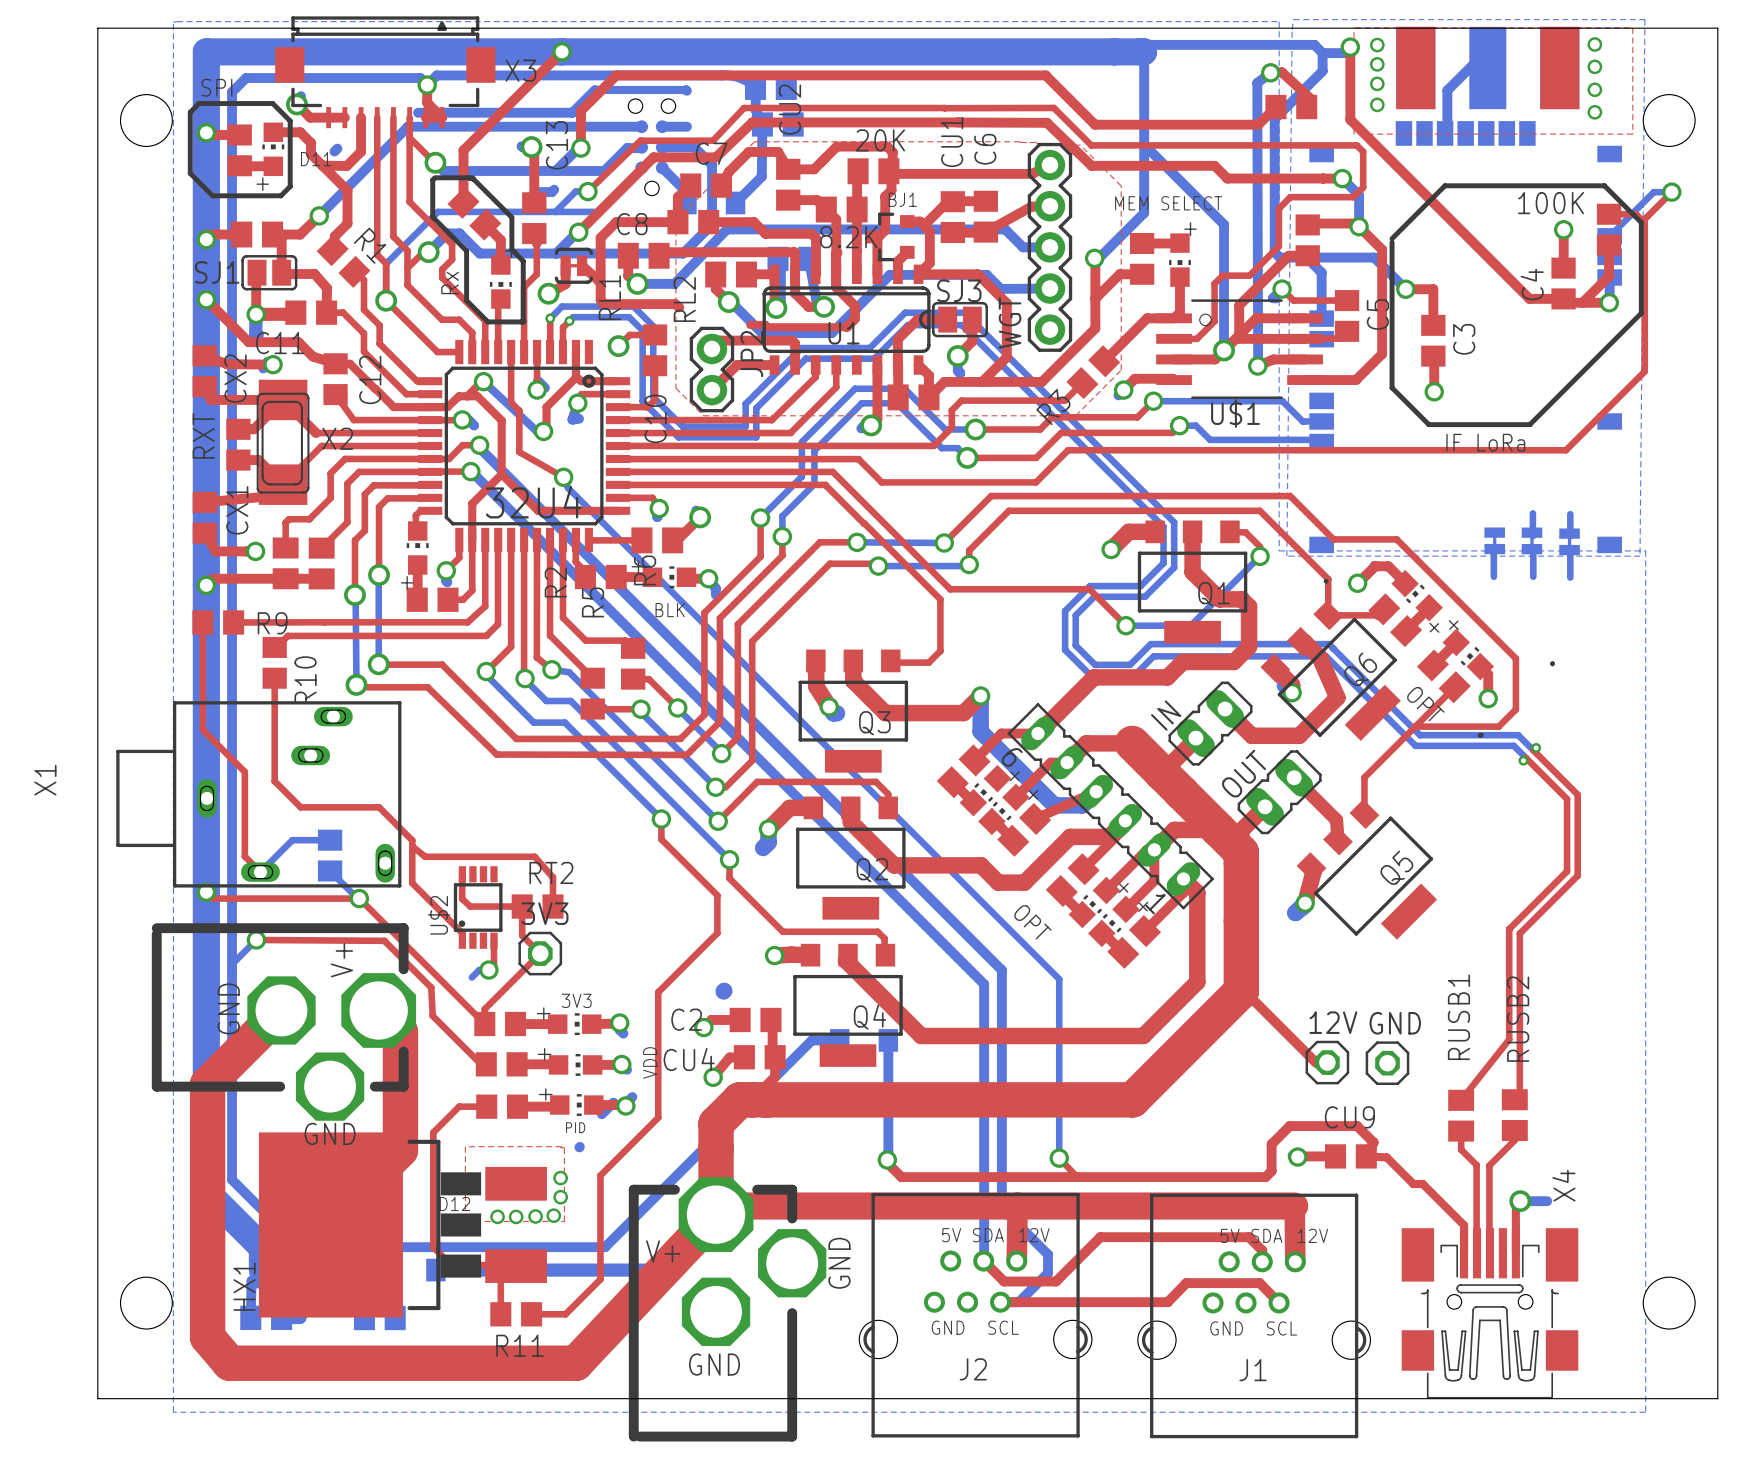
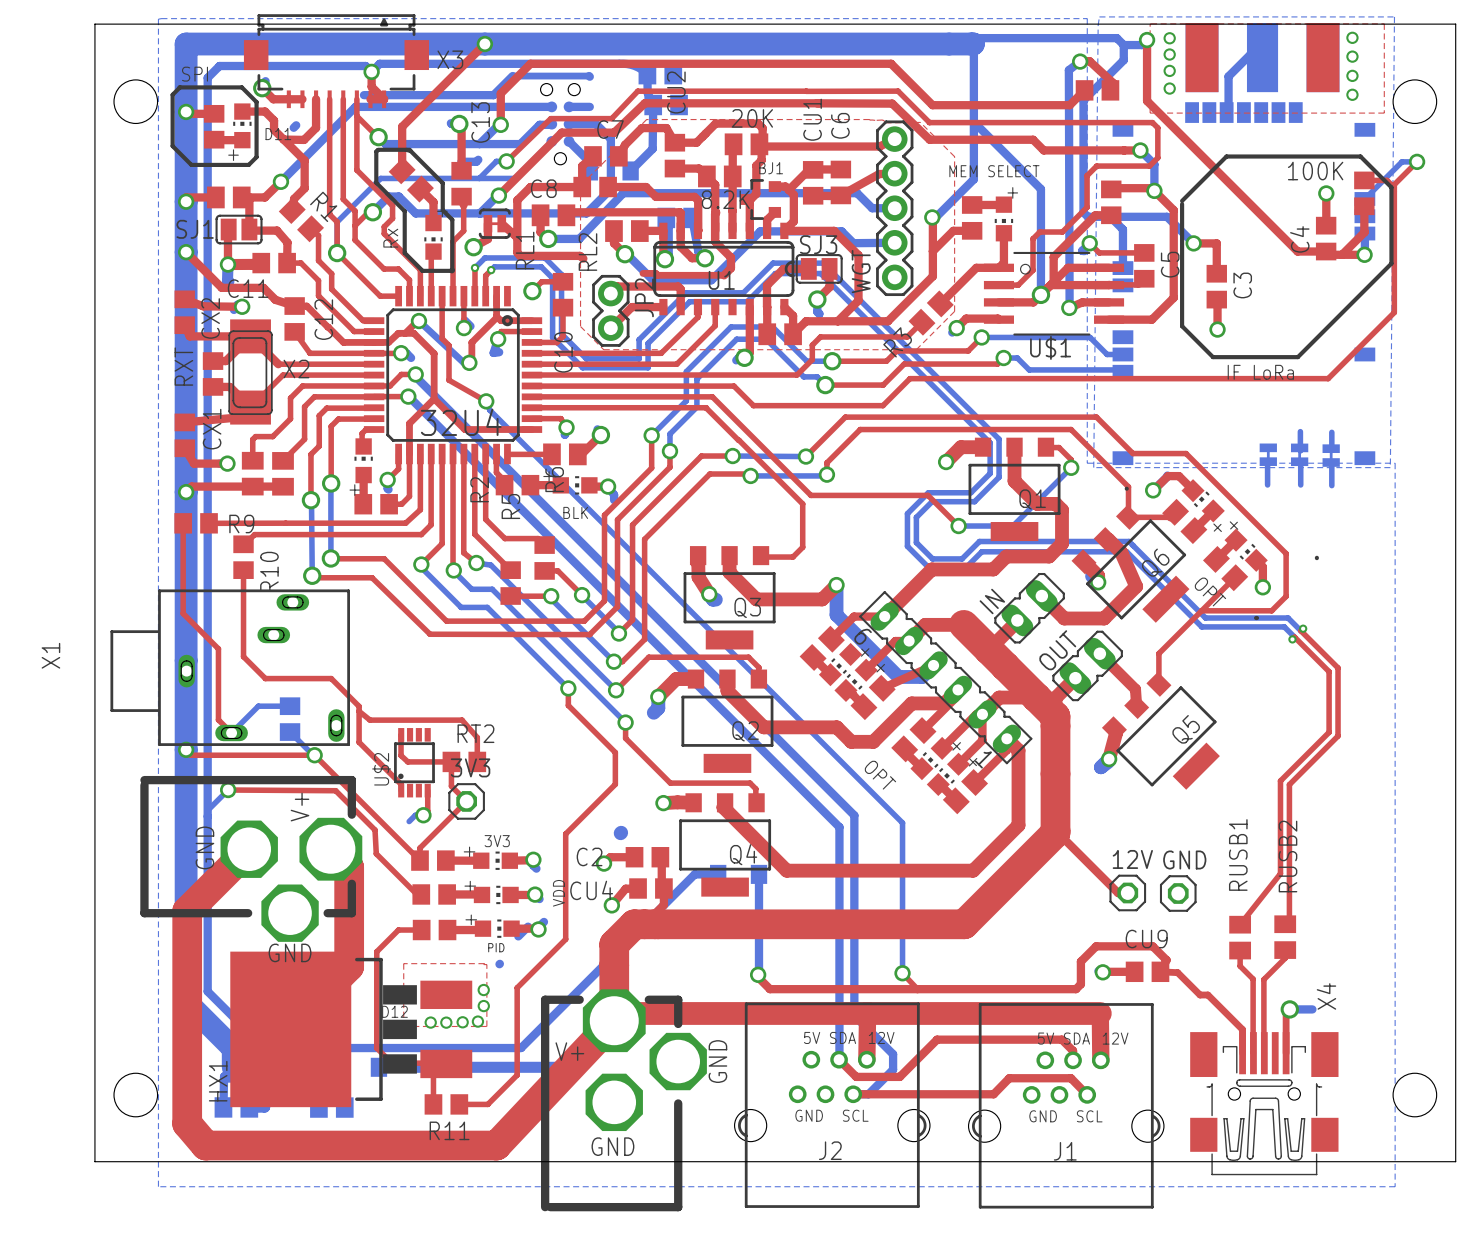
board edge: (97, 1382) (97, 1398) (1717, 1398) (1717, 1382) -> (94, 1161) (1455, 1161)

